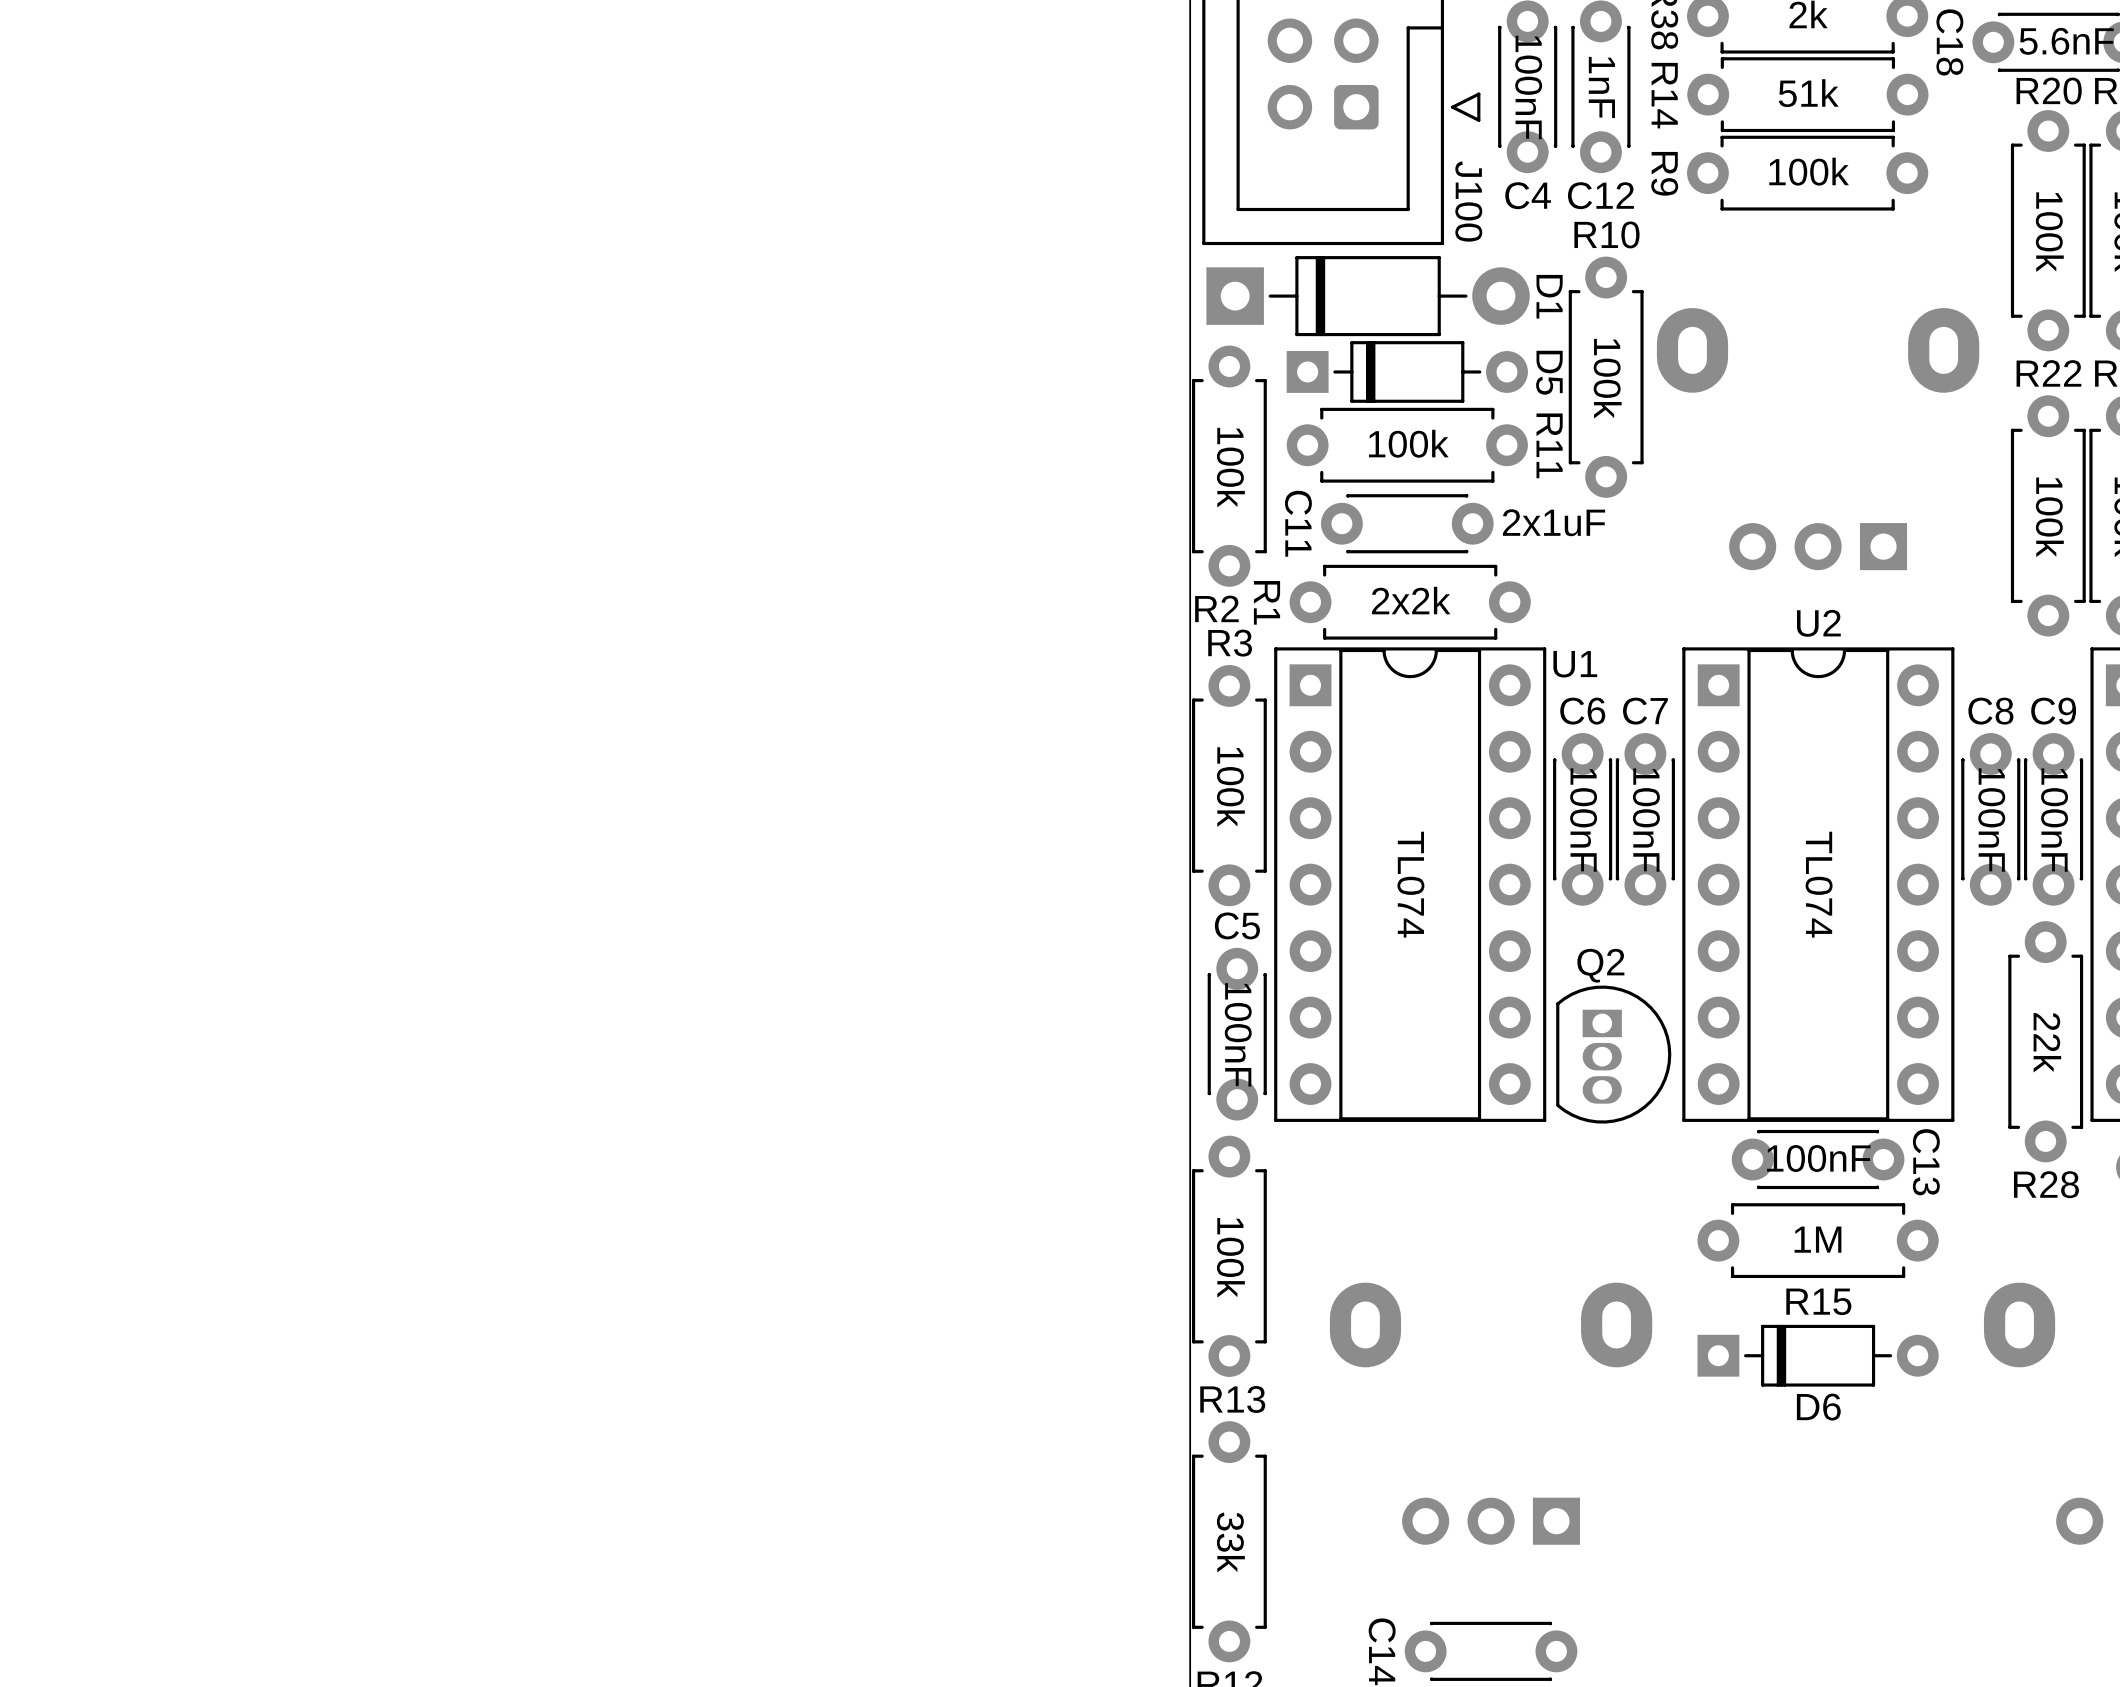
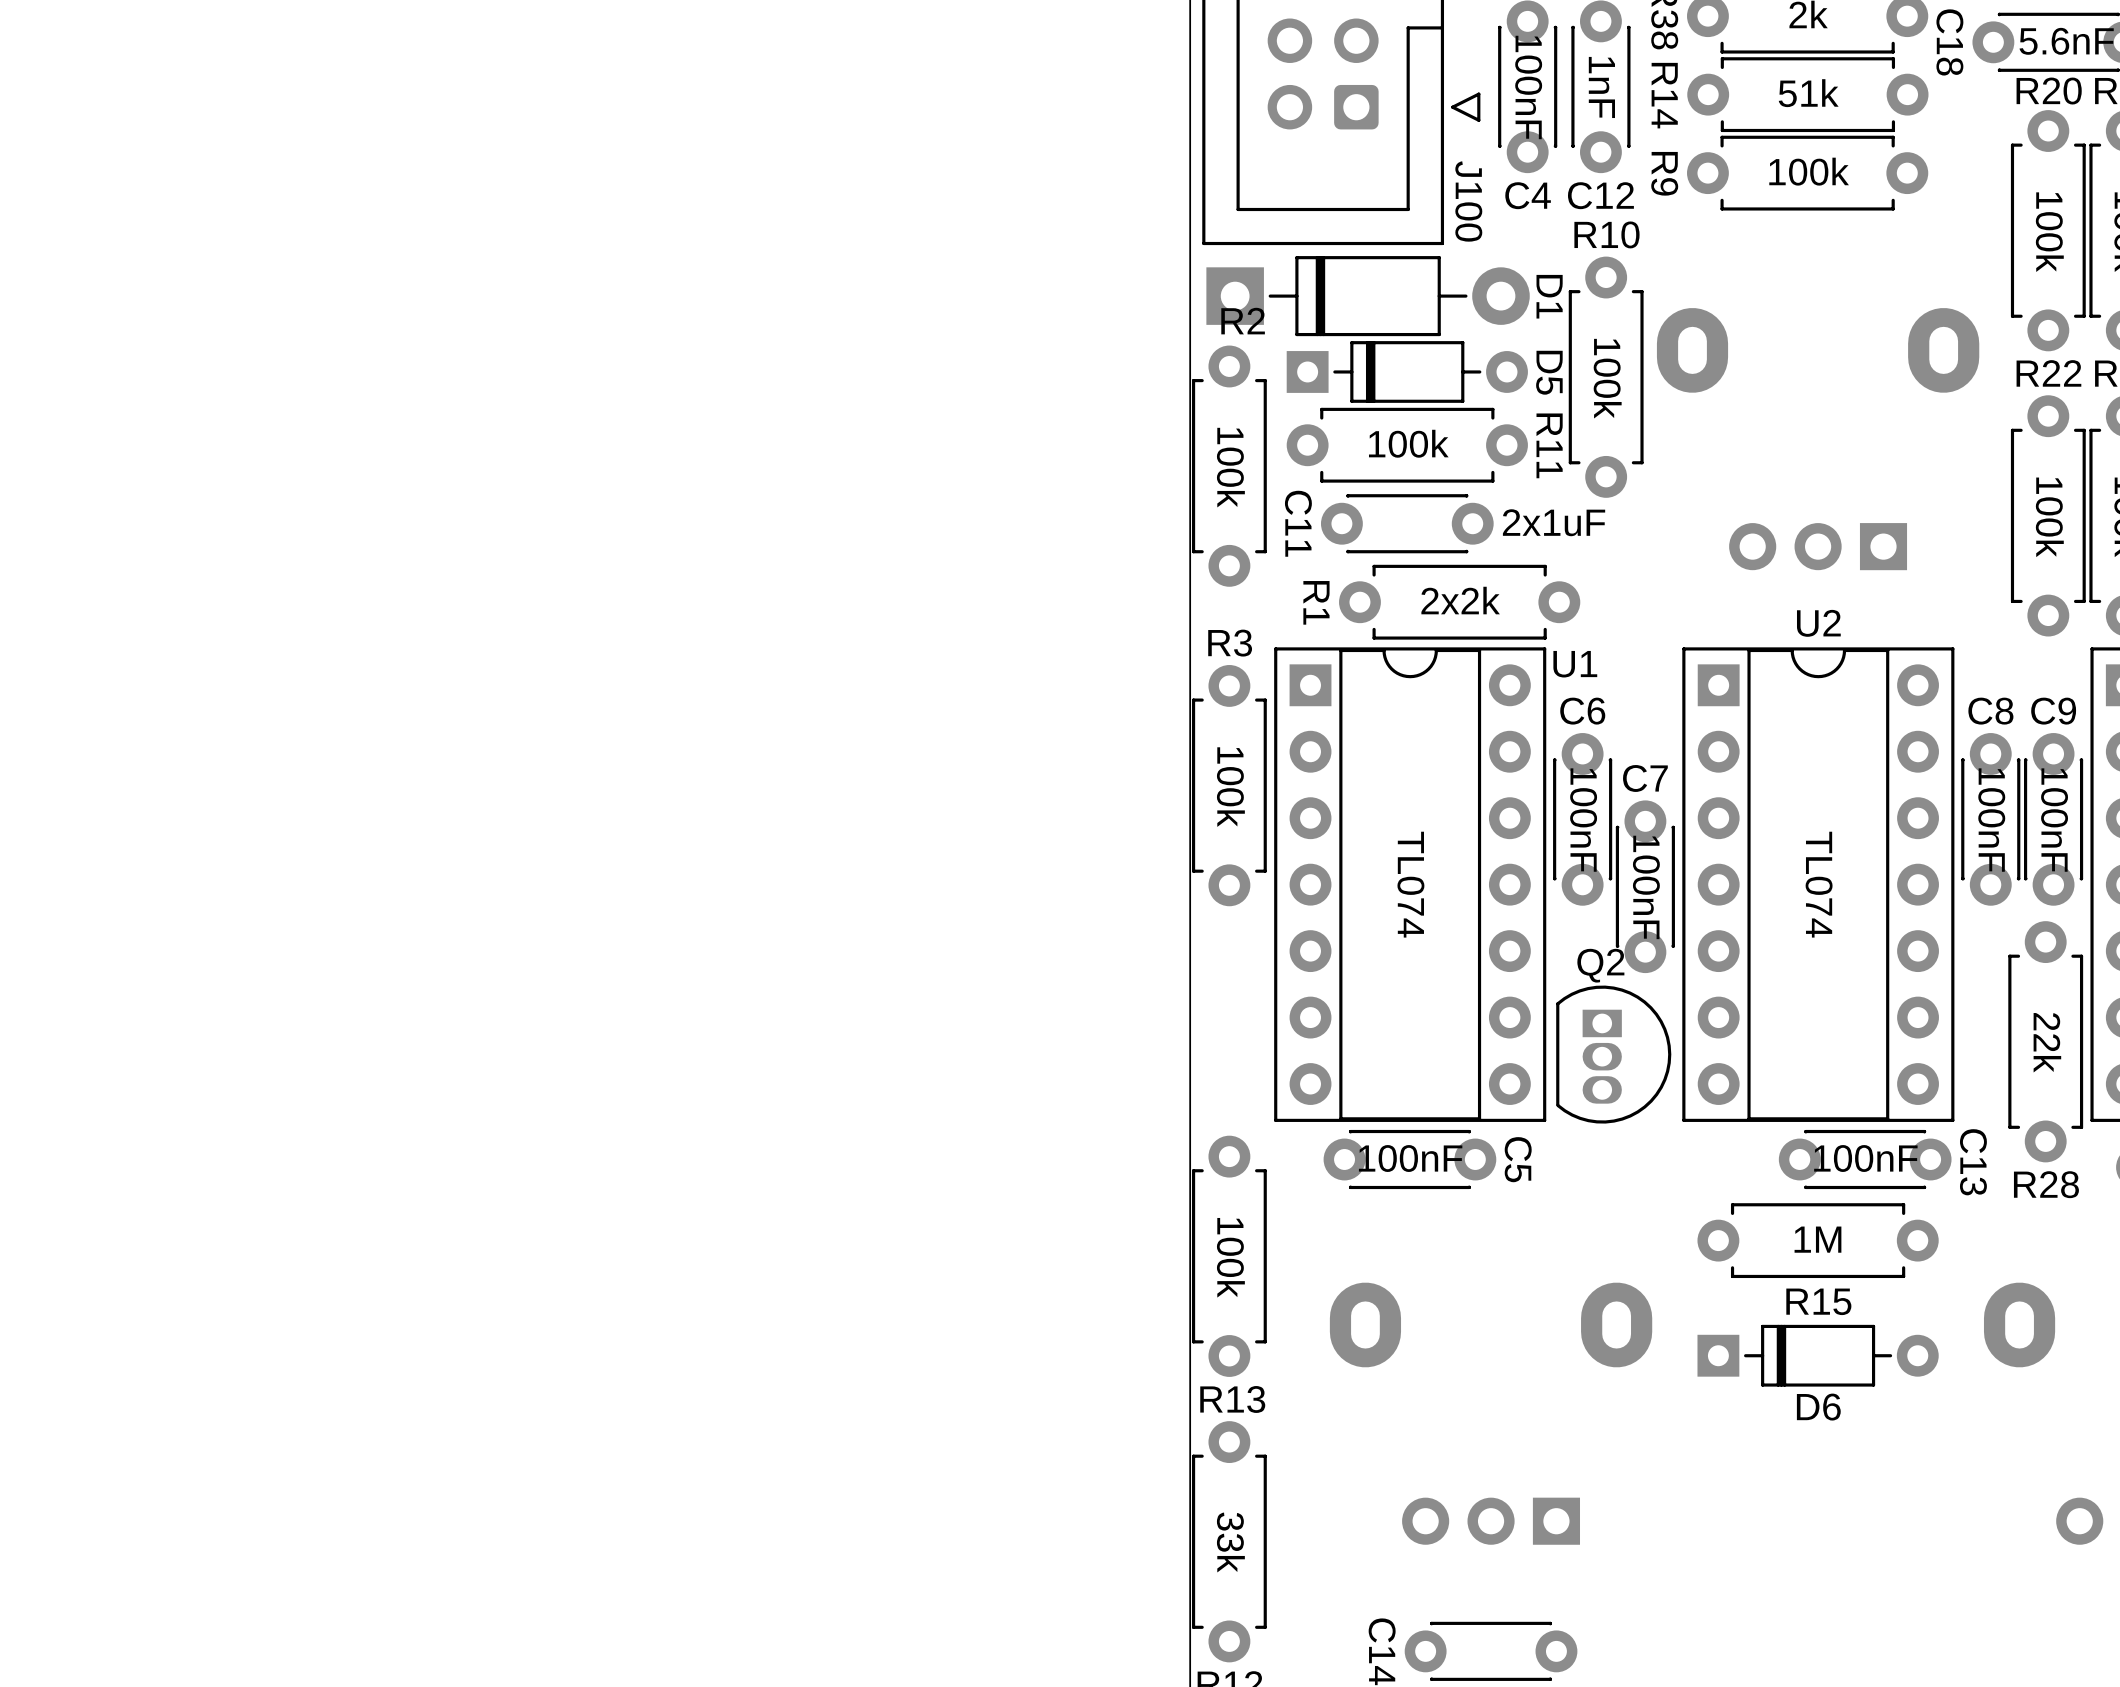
R1 position: (1410, 602) -> (1459, 602)
R2 name position: R2 (1216, 608) -> R2 (1243, 321)
C7 position: (1645, 819) -> (1645, 886)
C5 rotation: 0° (1237, 1034) -> 90° clockwise (1409, 1159)
C5 position: (1237, 1034) -> (1409, 1159)
C13 position: (1818, 1159) -> (1865, 1159)

